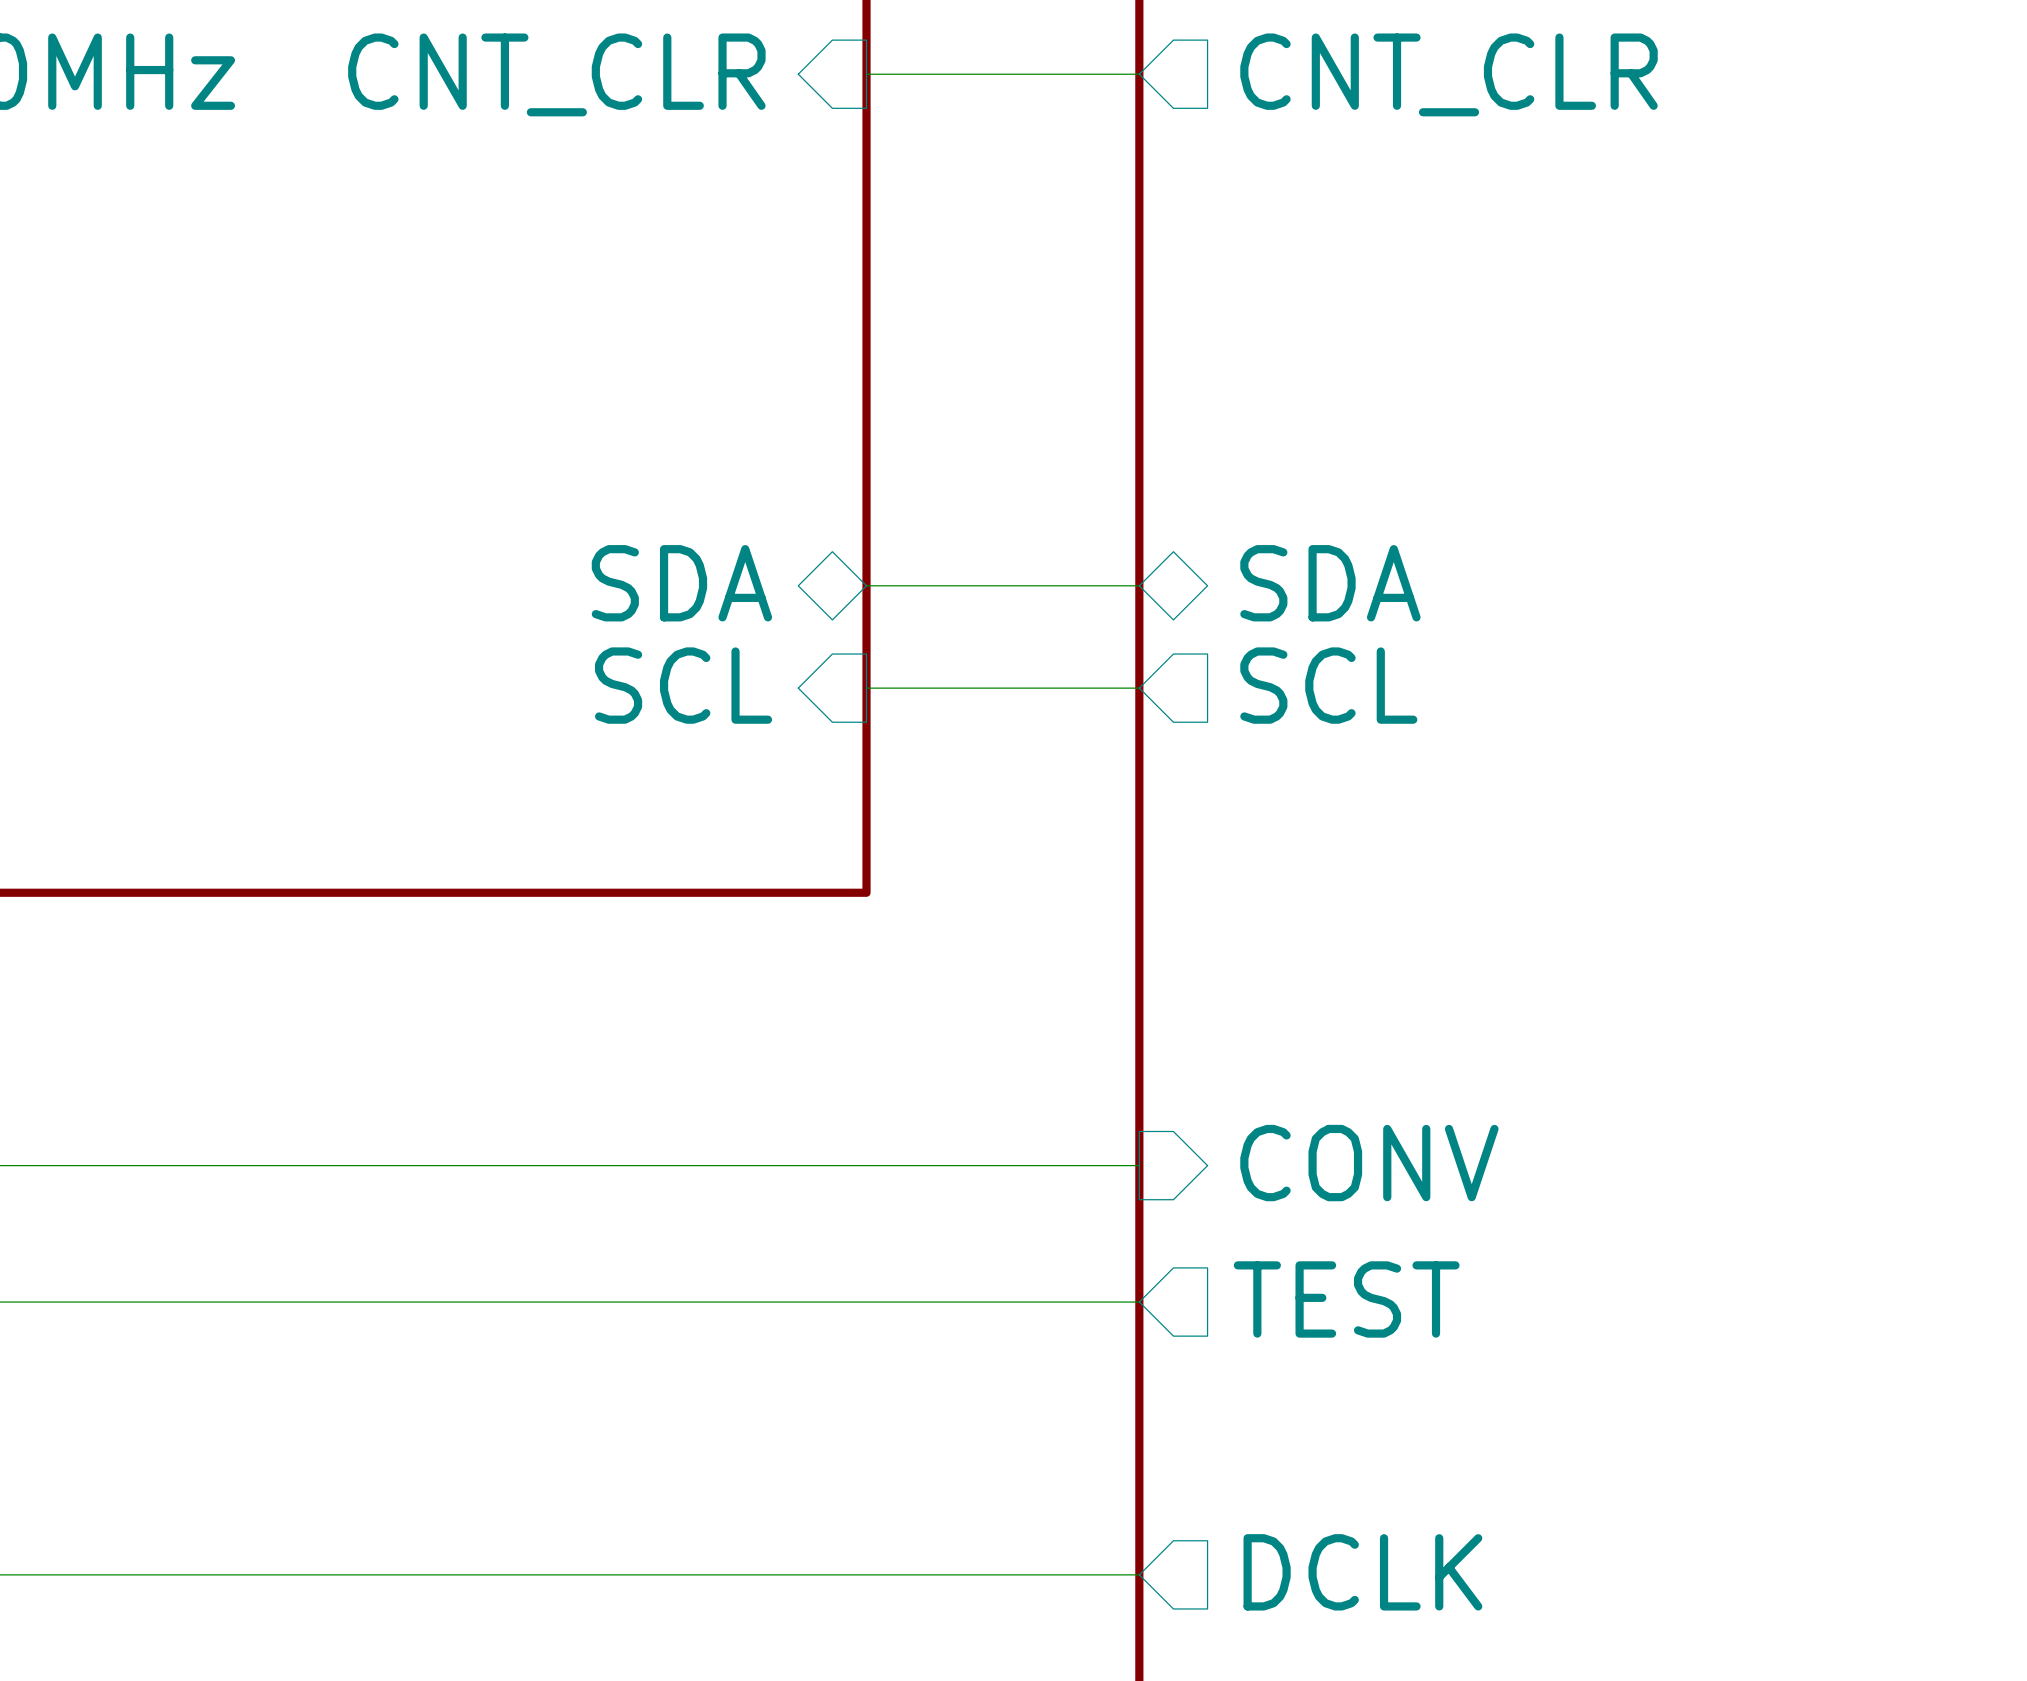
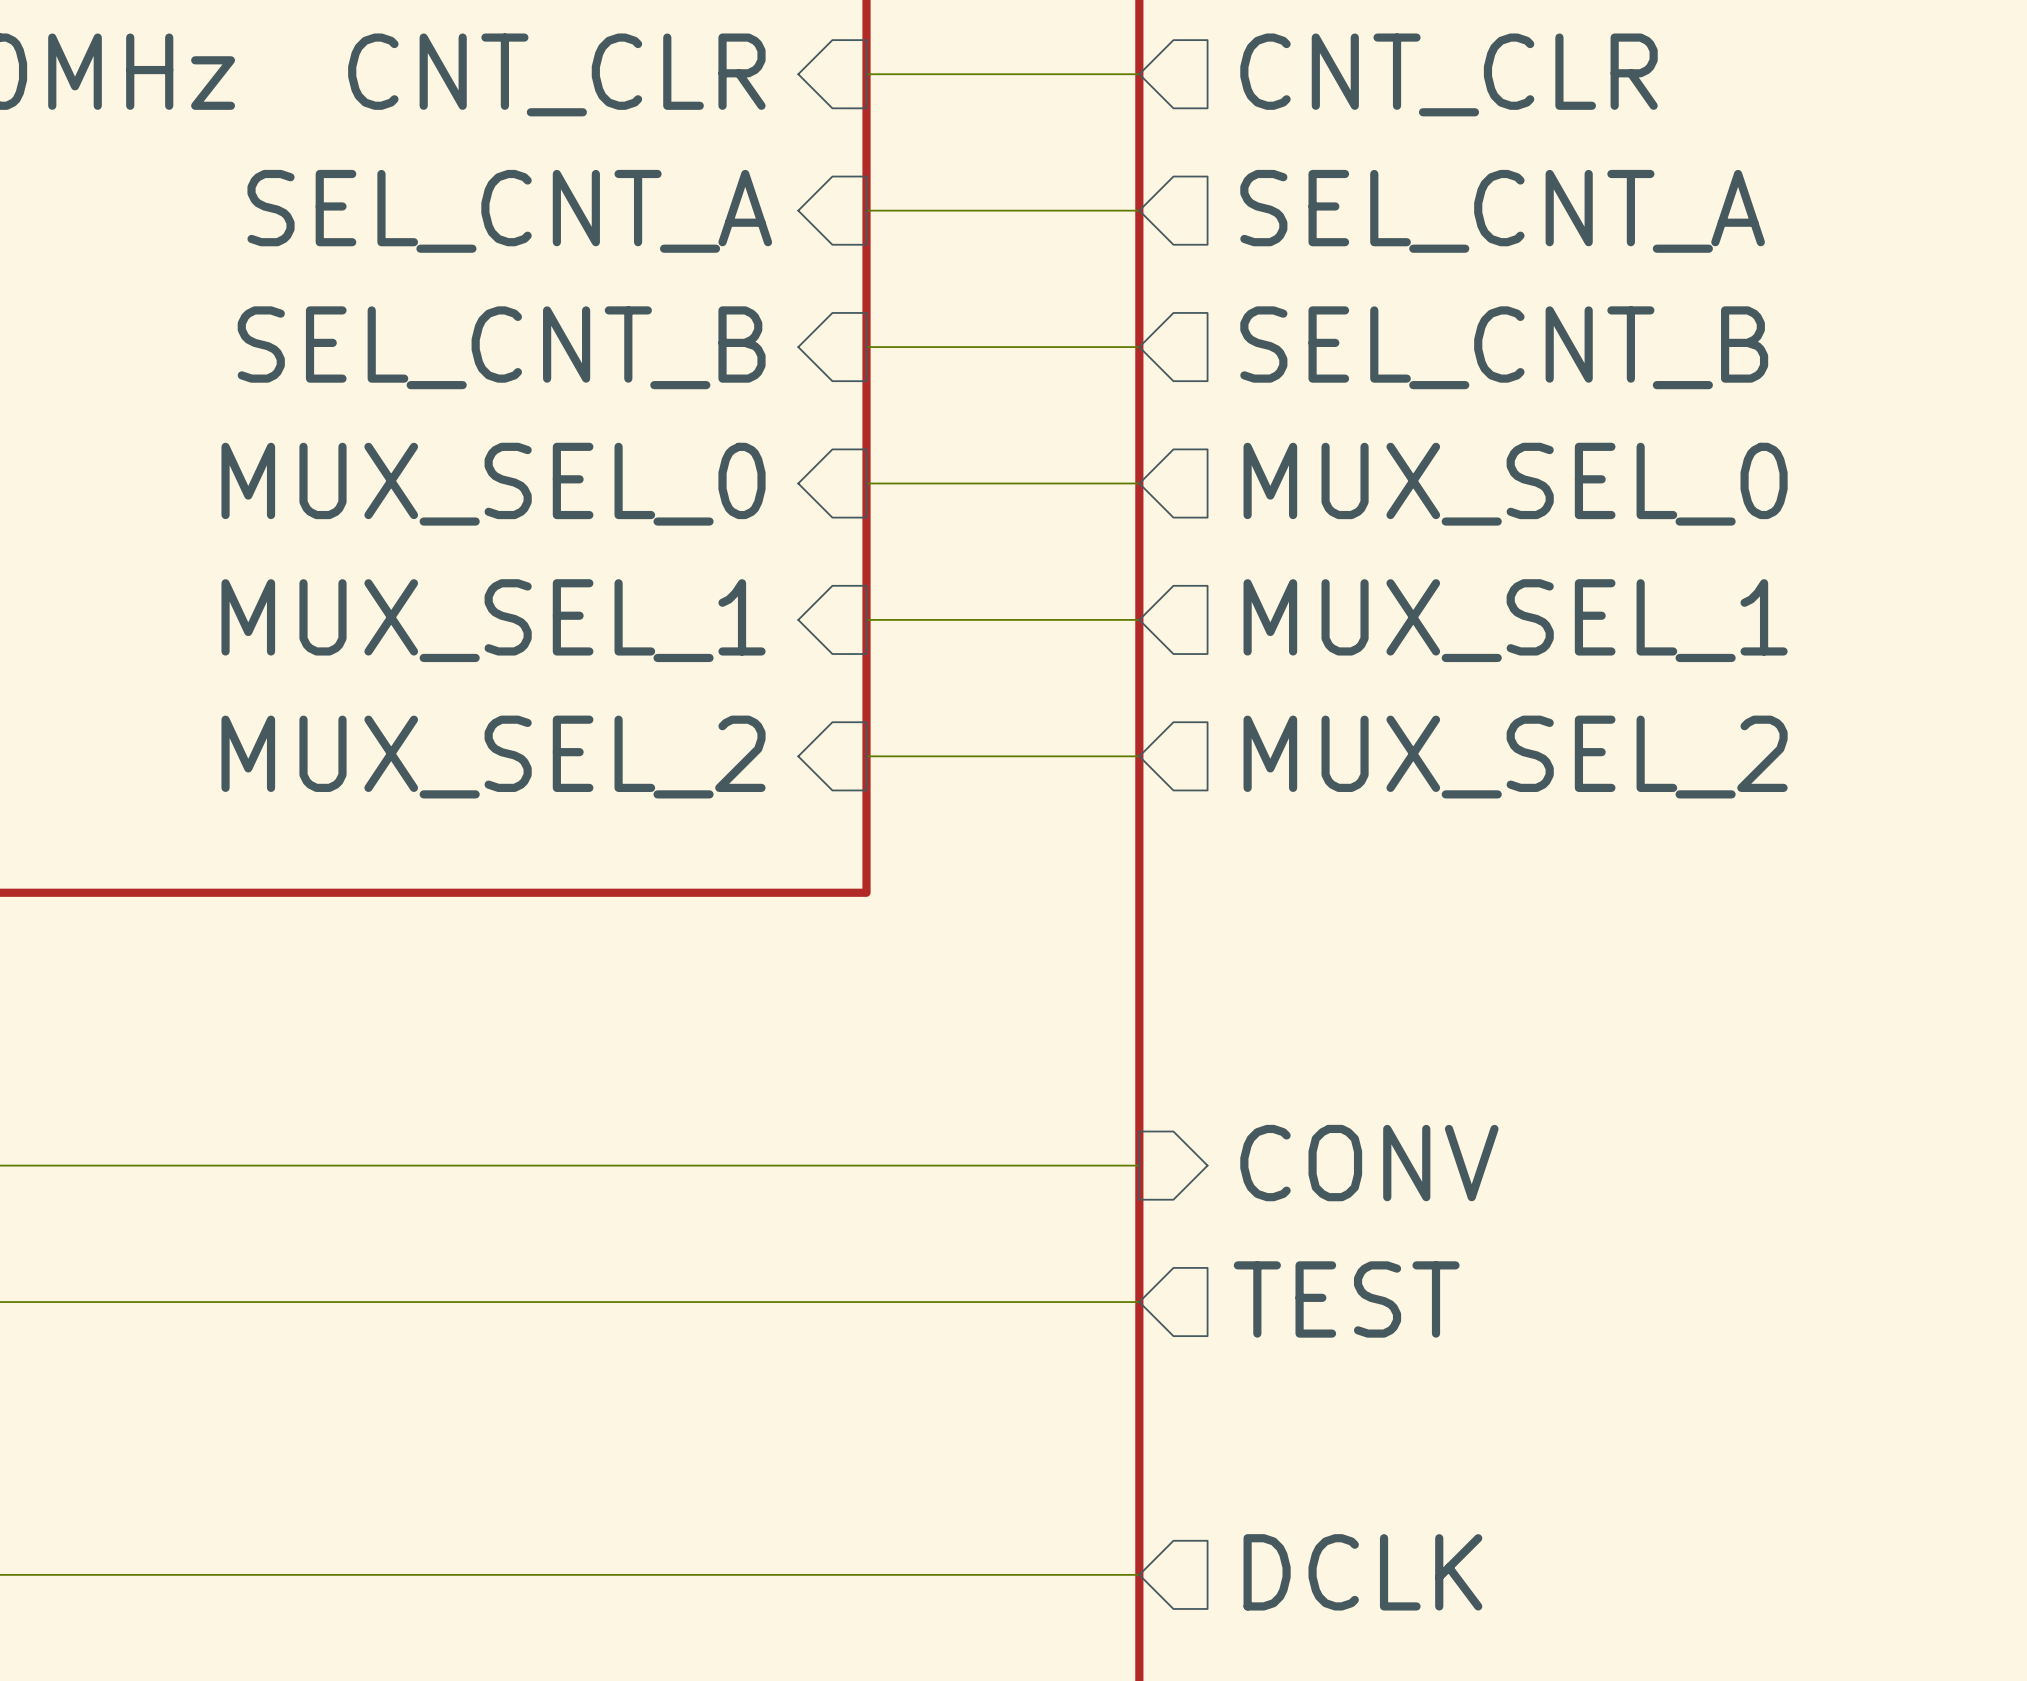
wire: none -> (866, 210) (1139, 210)
sheet pin: none -> SEL_CNT_A (509, 211)
sheet pin: none -> SEL_CNT_A (1502, 211)
sheet pin: none -> SEL_CNT_B (501, 347)
wire: none -> (866, 347) (1139, 347)
sheet pin: none -> SEL_CNT_B (1504, 347)
wire: none -> (866, 483) (1139, 483)
sheet pin: none -> MUX_SEL_0 (493, 484)
sheet pin: none -> MUX_SEL_0 (1515, 484)
sheet pin: SDA (681, 583) -> none
sheet pin: SDA (1330, 583) -> none
wire: (866, 585) (1139, 585) -> (866, 619) (1139, 619)
sheet pin: none -> MUX_SEL_1 (493, 620)
sheet pin: none -> MUX_SEL_1 (1515, 620)
sheet pin: SCL (683, 685) -> none
sheet pin: SCL (1328, 685) -> none
wire: (866, 688) (1139, 688) -> (866, 756) (1139, 756)
sheet pin: none -> MUX_SEL_2 (493, 757)
sheet pin: none -> MUX_SEL_2 (1515, 757)

